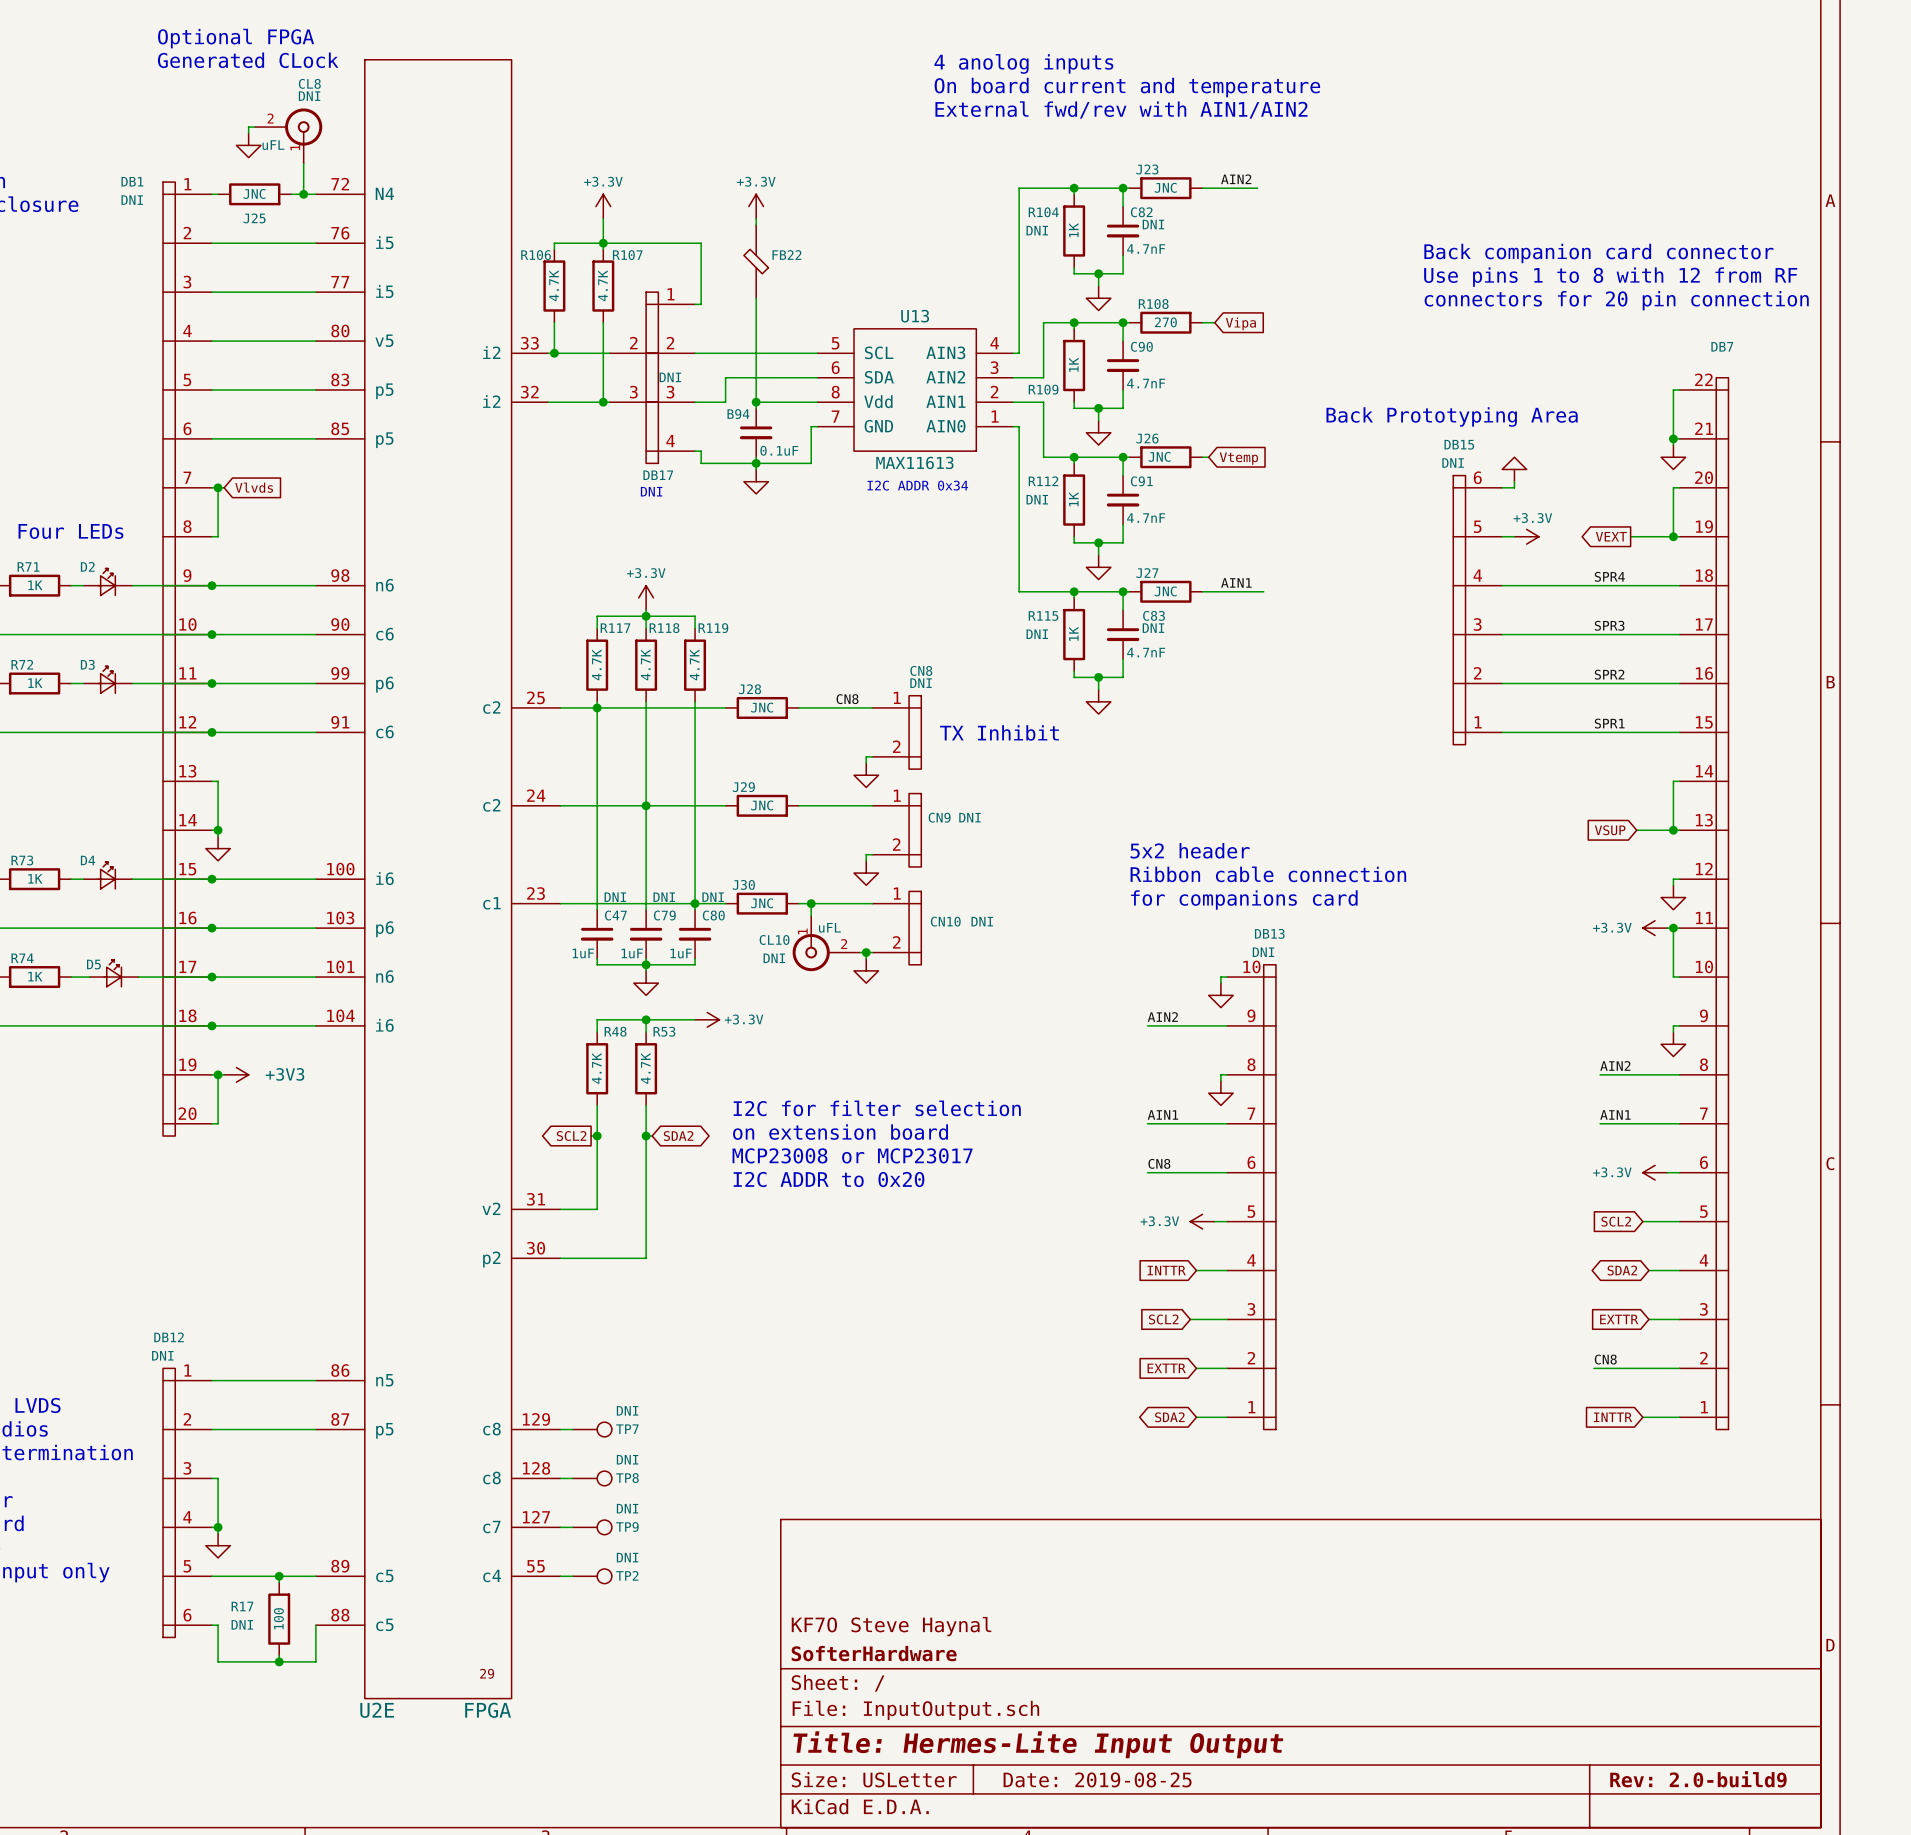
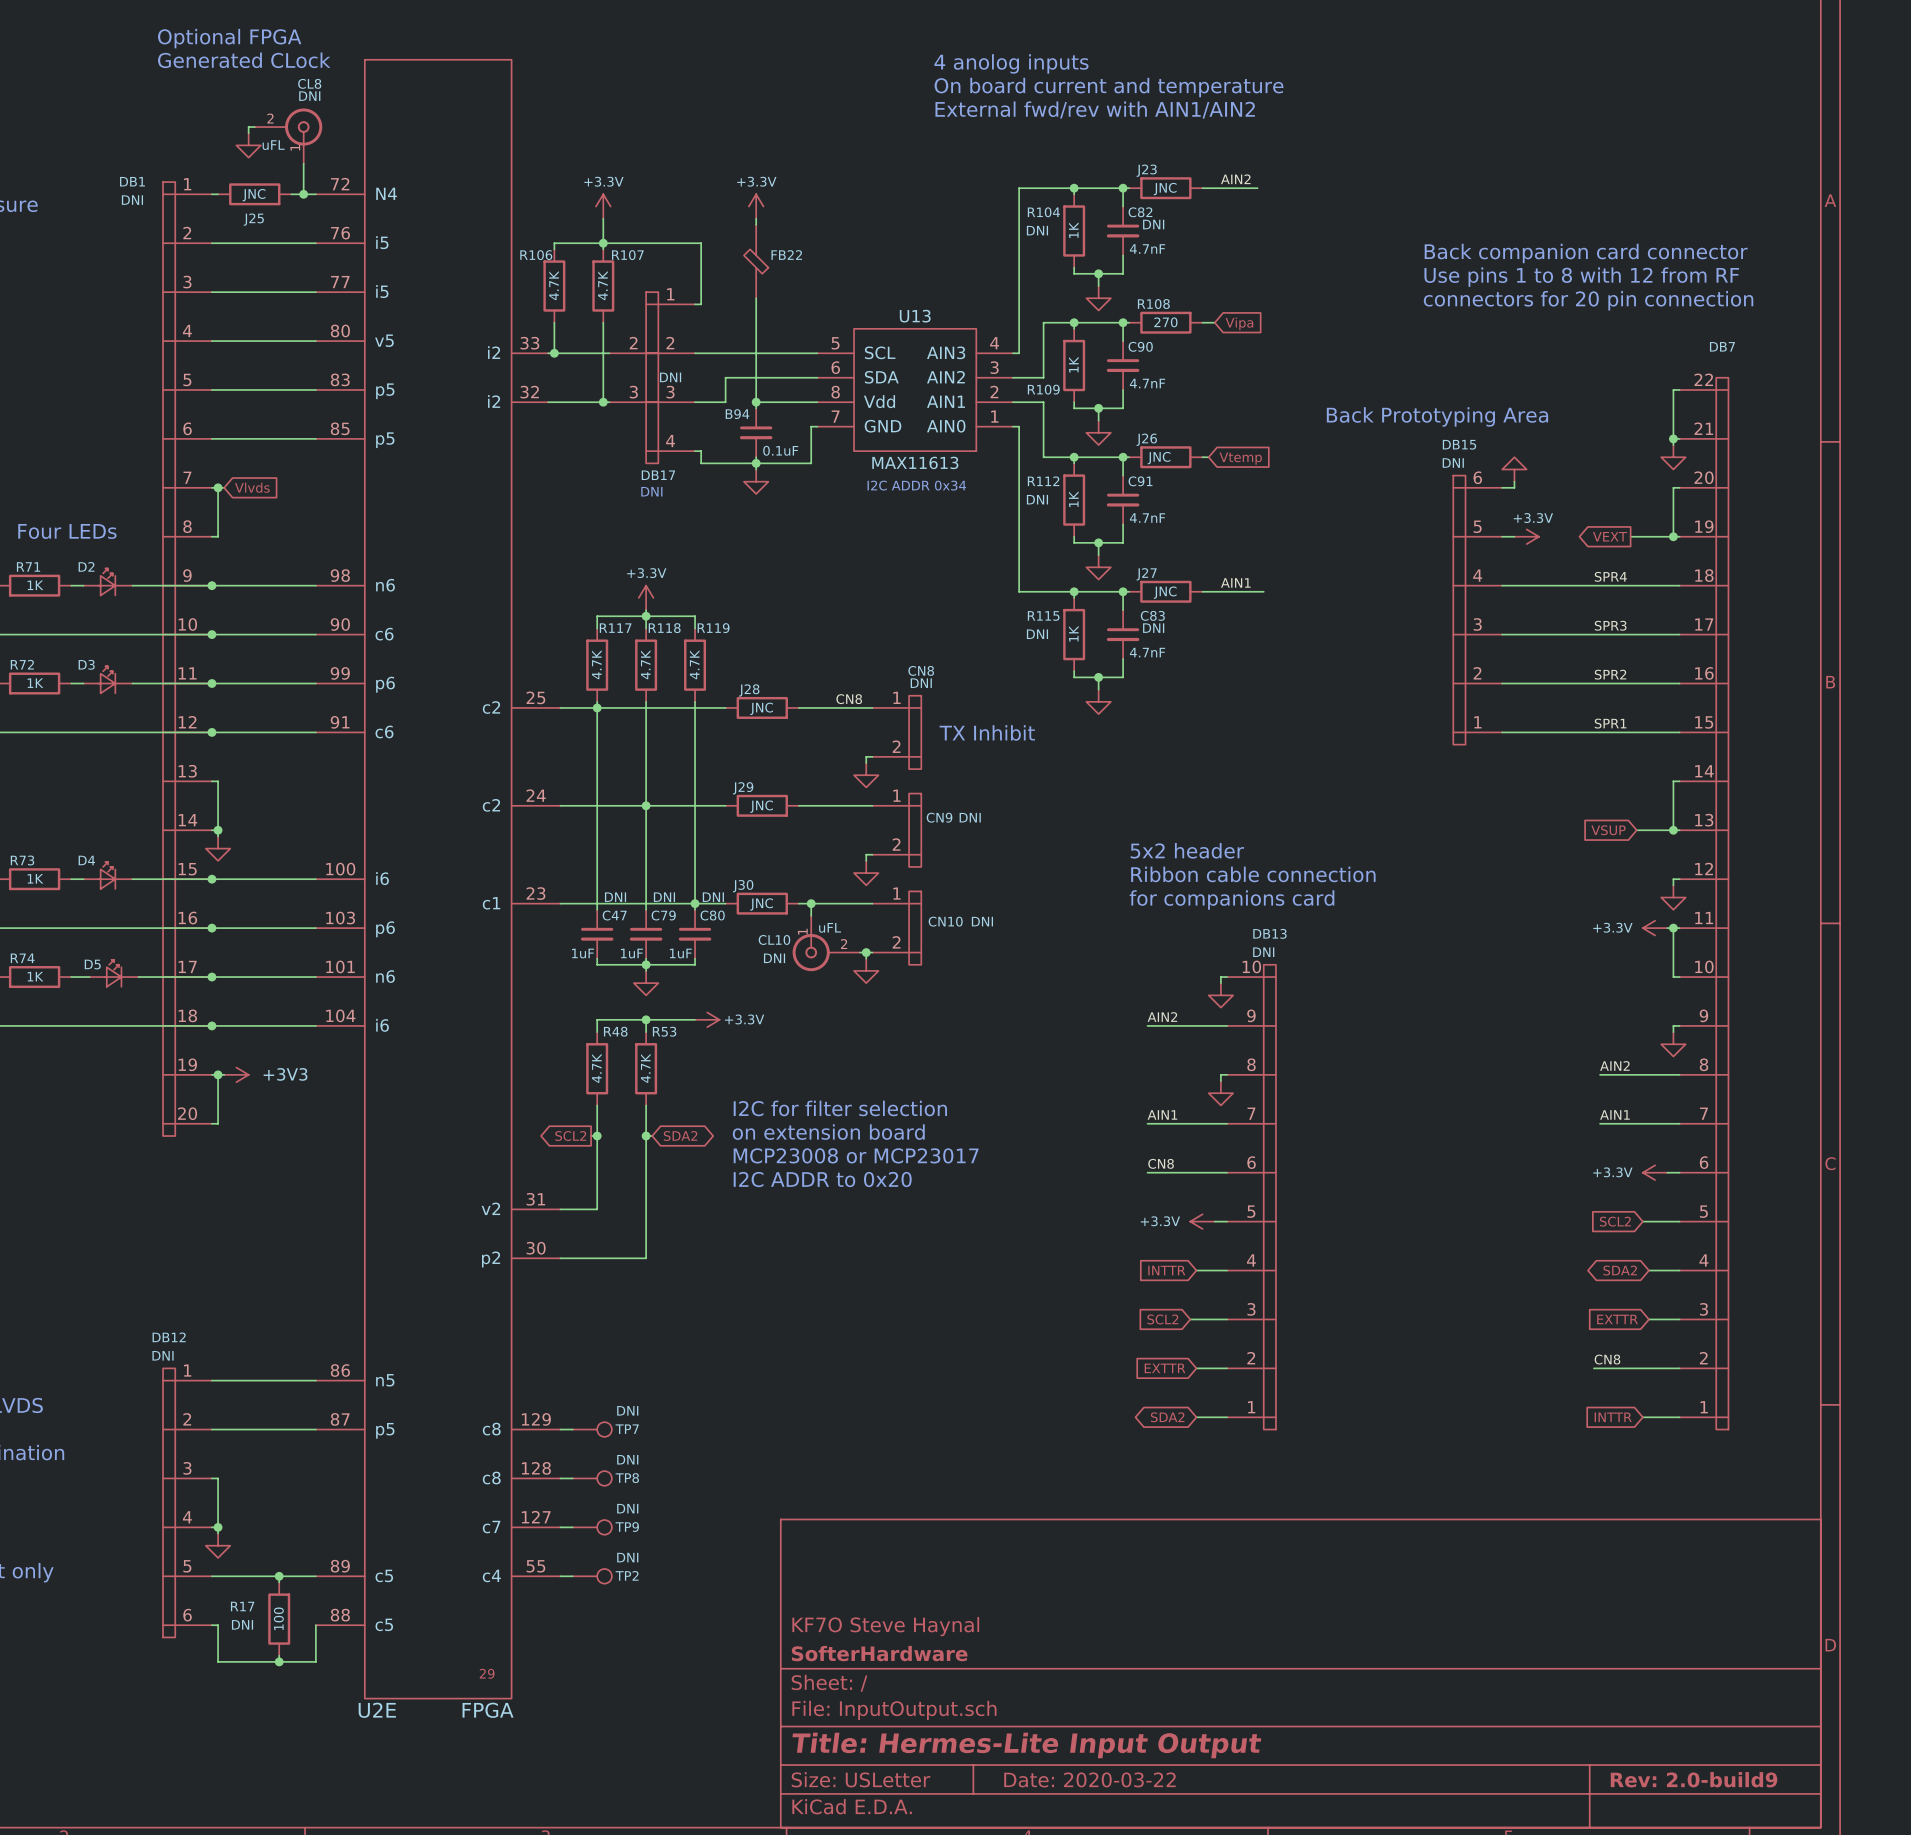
title block: Date: 2019-08-25 (1097, 1779) -> Date: 2020-03-22 (1089, 1779)

